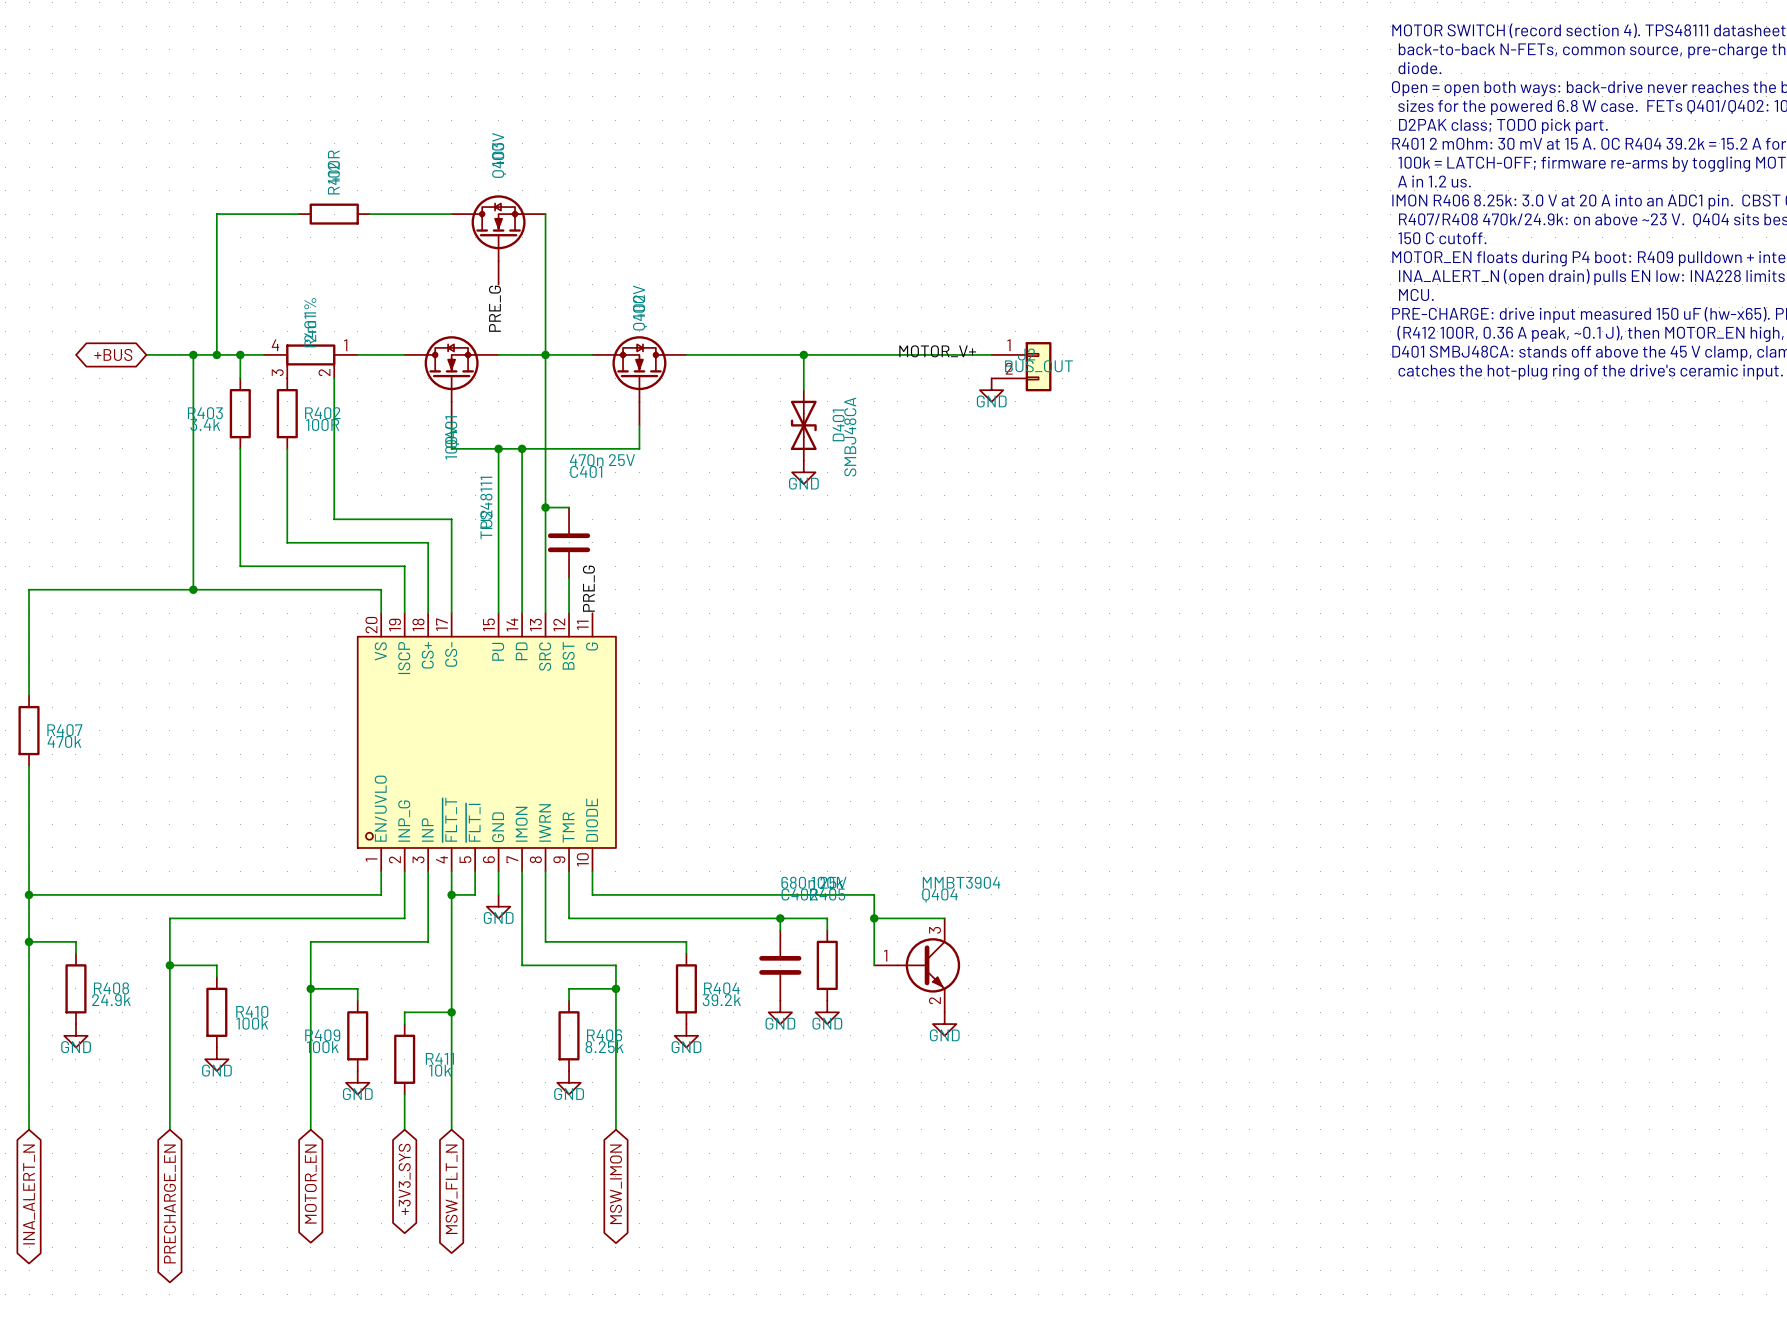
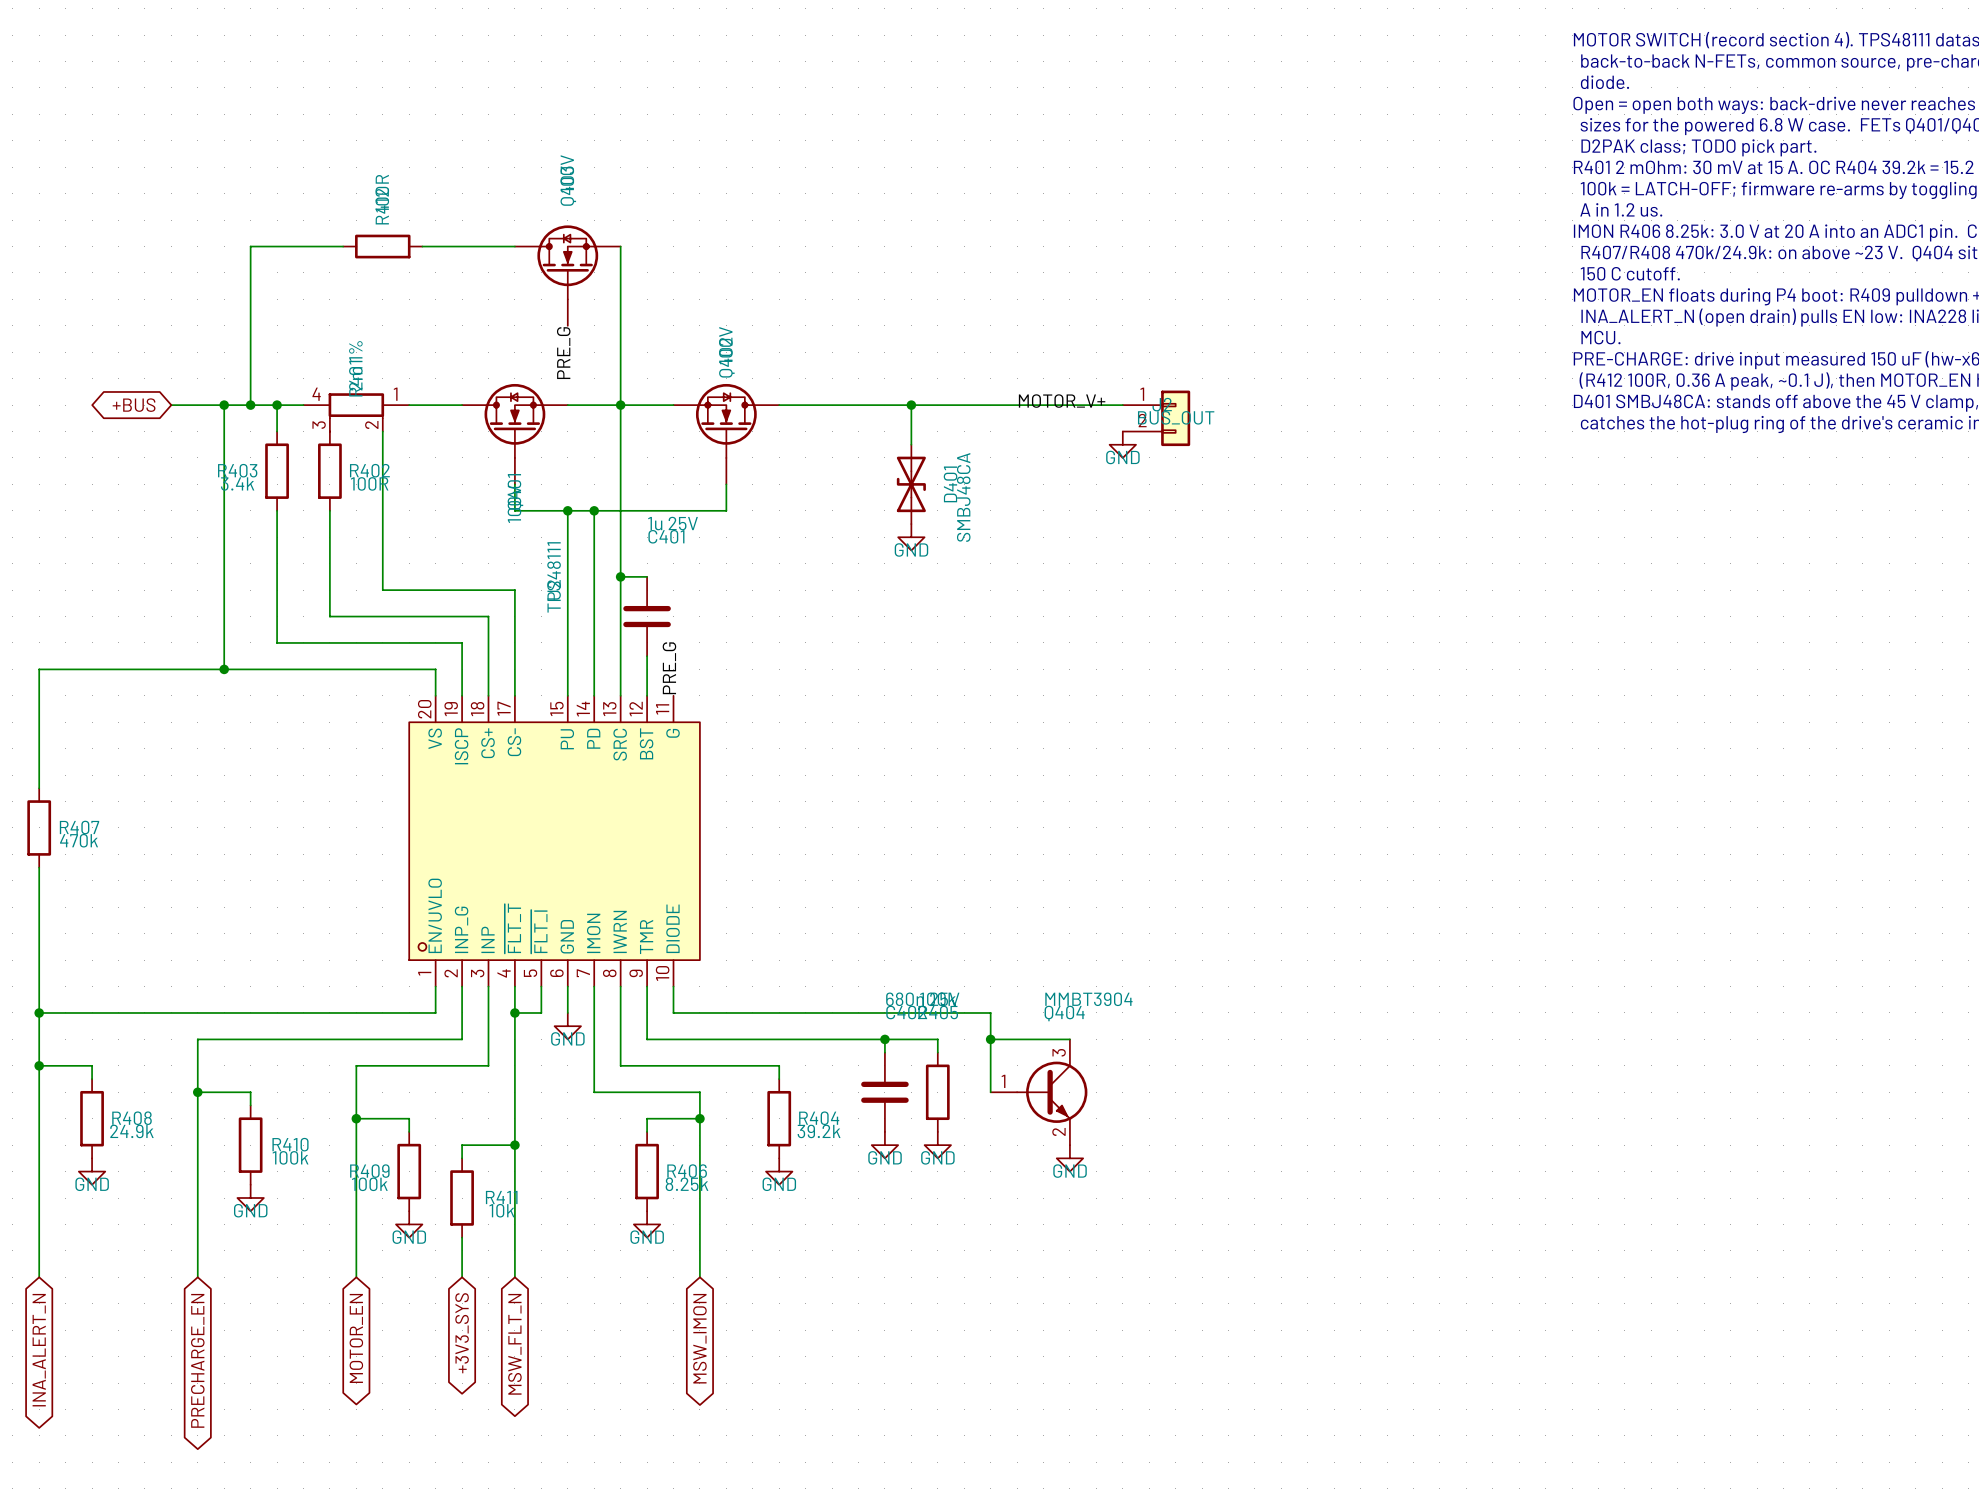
C401 value: 470n 25V (602, 460) -> 1u 25V (673, 523)

